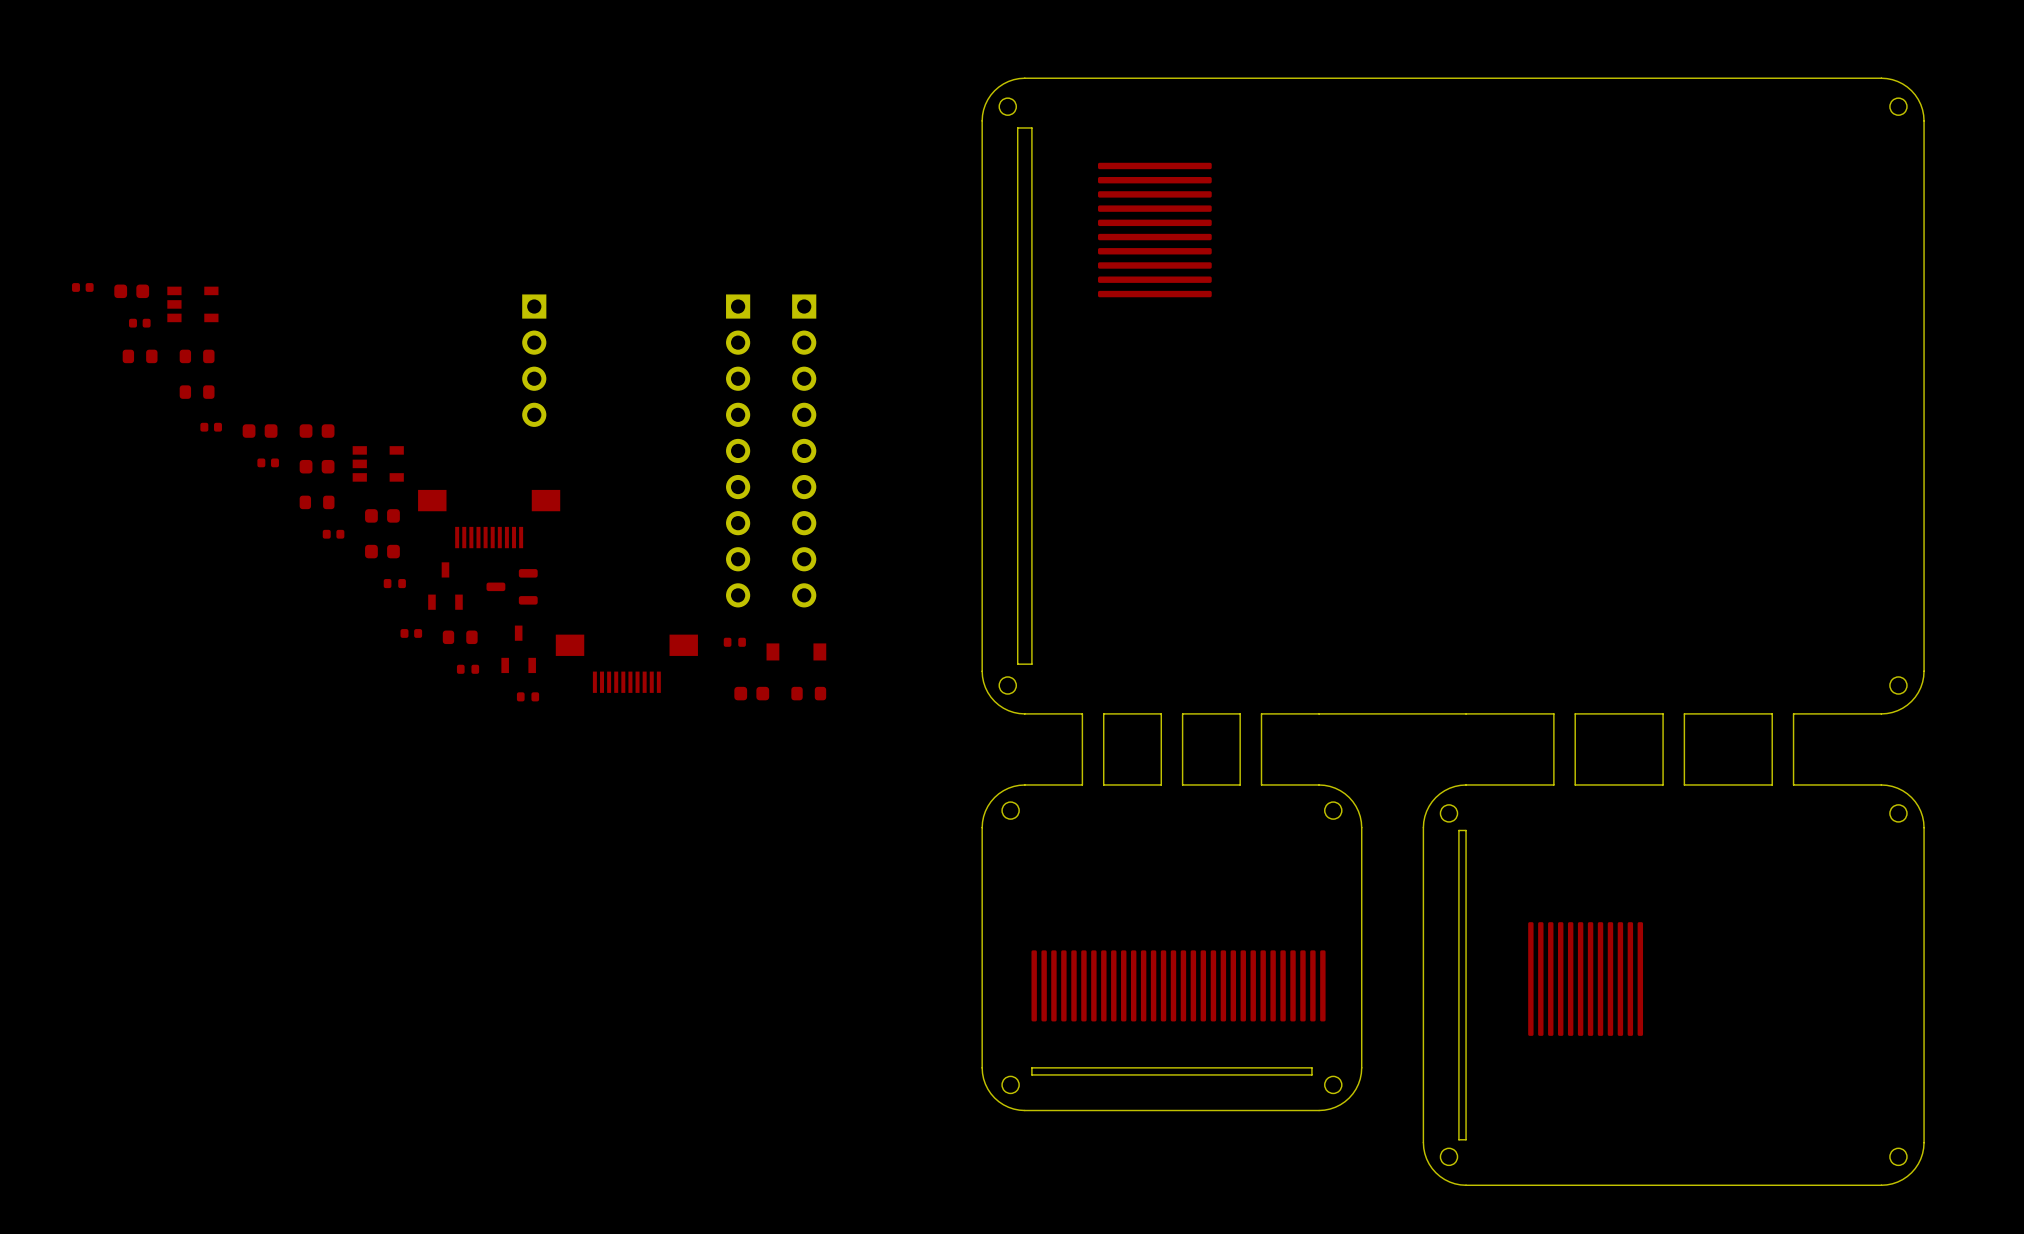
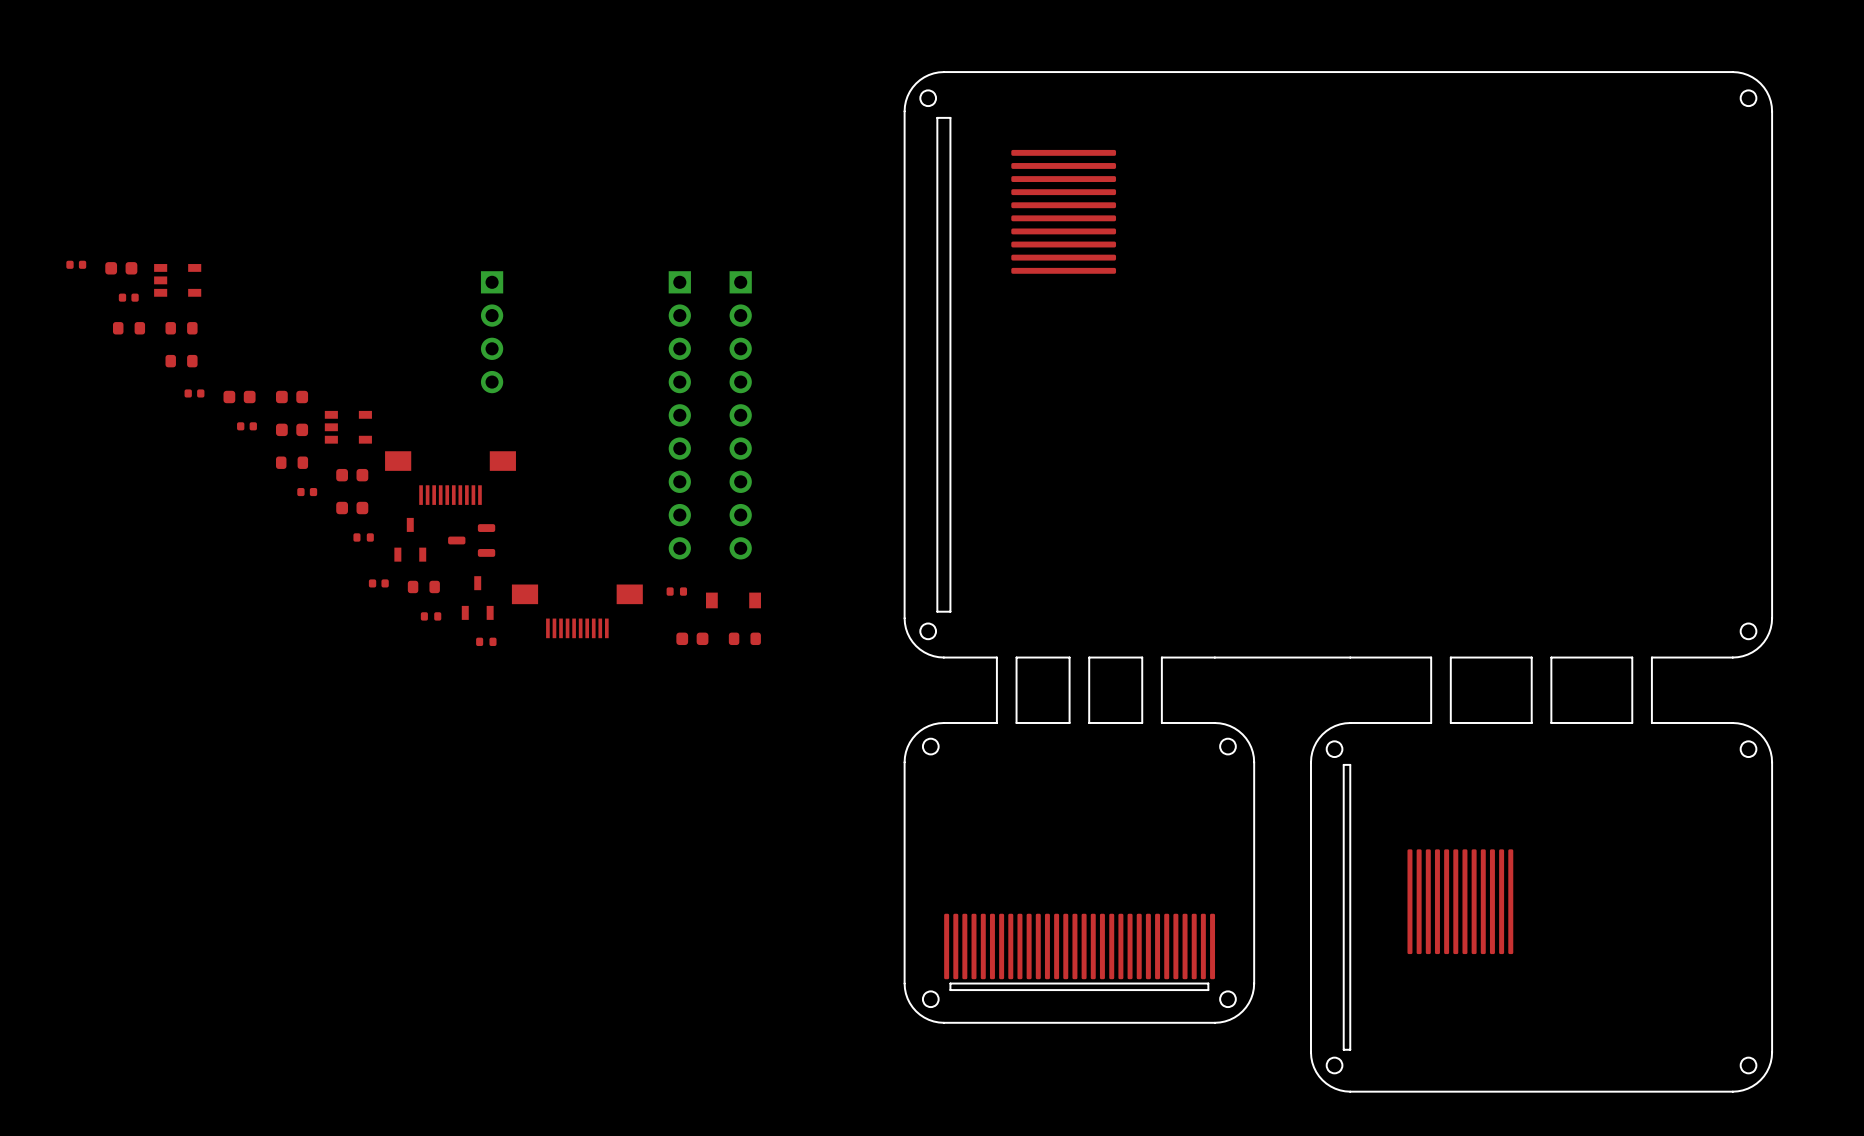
part position: (1178, 985) -> (1079, 946)

